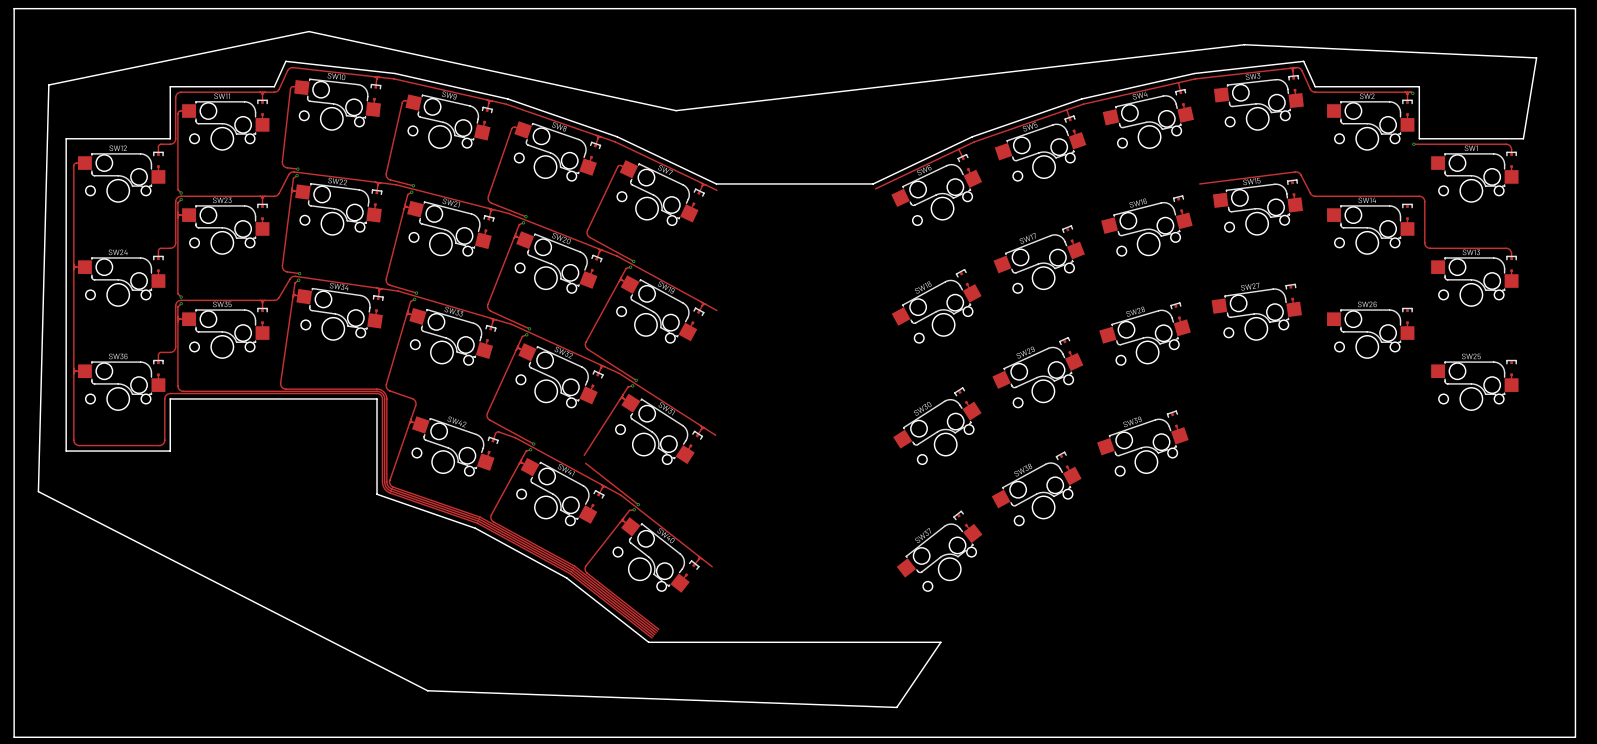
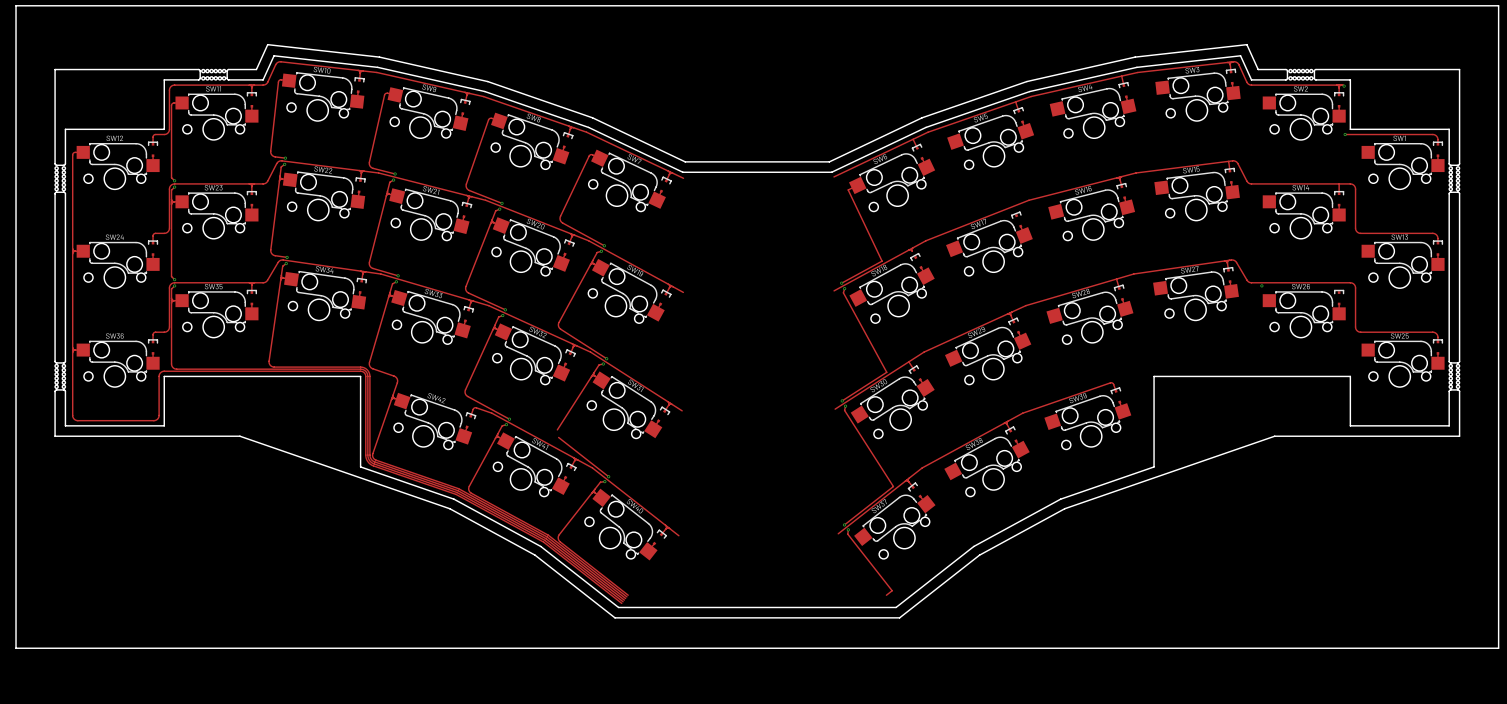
round board edge: none -> [201, 69, 206, 73]
round board edge: none -> [205, 69, 210, 73]
round board edge: none -> [209, 69, 214, 73]
round board edge: none -> [213, 69, 218, 73]
round board edge: none -> [218, 69, 222, 73]
round board edge: none -> [222, 69, 226, 73]
round board edge: none -> [1288, 69, 1293, 73]
round board edge: none -> [1292, 69, 1297, 73]
round board edge: none -> [1297, 69, 1301, 73]
round board edge: none -> [1301, 69, 1305, 73]
round board edge: none -> [1305, 69, 1309, 73]
round board edge: none -> [1309, 69, 1314, 73]
round board edge: none -> [201, 76, 206, 81]
round board edge: none -> [205, 76, 210, 81]
round board edge: none -> [209, 76, 214, 81]
round board edge: none -> [213, 76, 218, 81]
round board edge: none -> [218, 76, 222, 81]
round board edge: none -> [222, 76, 226, 81]
round board edge: none -> [1288, 76, 1293, 81]
round board edge: none -> [1292, 76, 1297, 81]
round board edge: none -> [1297, 76, 1301, 81]
round board edge: none -> [1301, 76, 1305, 81]
round board edge: none -> [1305, 76, 1309, 81]
round board edge: none -> [1309, 76, 1314, 81]
board edge: (206, 86) (238, 86) -> (1285, 79) (1286, 69) (1258, 69) (1246, 44) (1135, 57) (1026, 81) (922, 117) (829, 161) (685, 161) (592, 117) (487, 81) (379, 57) (267, 44) (256, 69) (228, 69) (228, 79)
board edge: (1351, 86) (1383, 86) -> (1449, 129) (1449, 164) (1458, 165) (1459, 69) (1315, 69) (1314, 78) (1315, 79)
board edge: (1523, 138) (1536, 57) (1244, 44) (676, 110) (309, 31) (48, 84) (38, 491) (427, 690) (896, 707) (940, 642) -> (65, 391) (55, 391) (55, 436) (239, 436) (449, 508) (535, 555) (614, 617) (899, 617) (979, 555) (1064, 508) (1274, 436) (1459, 436) (1459, 390) (1449, 391) (1449, 425) (1350, 425) (1350, 376) (1154, 376) (1154, 466) (1060, 499) (973, 546) (896, 607)
track: none -> (1228, 161) (1229, 171)
board edge: (66, 174) (66, 206) -> (65, 163) (63, 165) (55, 163) (55, 69) (198, 69) (200, 78) (198, 79)
round board edge: none -> [54, 166, 59, 171]
round board edge: none -> [62, 166, 66, 171]
round board edge: none -> [1448, 166, 1453, 171]
round board edge: none -> [1456, 166, 1460, 171]
round board edge: none -> [54, 170, 59, 175]
round board edge: none -> [62, 170, 66, 175]
round board edge: none -> [1448, 170, 1453, 175]
round board edge: none -> [1456, 170, 1460, 175]
track: none -> (1141, 172) (1028, 200) (925, 240) (834, 290)
round board edge: none -> [54, 174, 59, 179]
round board edge: none -> [62, 174, 66, 179]
round board edge: none -> [1448, 174, 1453, 179]
round board edge: none -> [1456, 174, 1460, 179]
track: none -> (1121, 176) (1120, 179) (1116, 177)
track: none -> (1119, 177) (1121, 186)
round board edge: none -> [54, 179, 59, 183]
round board edge: none -> [62, 179, 66, 183]
round board edge: none -> [1448, 179, 1453, 183]
round board edge: none -> [1456, 179, 1460, 183]
round board edge: none -> [54, 183, 59, 187]
round board edge: none -> [62, 183, 66, 187]
round board edge: none -> [1448, 183, 1453, 187]
round board edge: none -> [1456, 183, 1460, 187]
track: none -> (1339, 183) (1339, 193)
track: none -> (857, 185) (848, 189) (882, 261) (841, 283)
round board edge: none -> [54, 187, 59, 191]
round board edge: none -> [62, 187, 66, 191]
round board edge: none -> [1448, 187, 1453, 191]
round board edge: none -> [1456, 187, 1460, 191]
board edge: none -> (1450, 192) (1459, 193) (1459, 361) (1458, 362) (1449, 361) (1449, 193) (1450, 192)
track: none -> (913, 247) (912, 251) (908, 250)
track: none -> (1229, 260) (1227, 263) (1224, 260)
track: none -> (1227, 260) (1228, 270)
track: none -> (1116, 279) (1119, 288)
via: none -> (841, 283)
via: none -> (1261, 285)
track: none -> (844, 288) (843, 292) (886, 372) (842, 400)
via: none -> (844, 288)
track: none -> (1012, 311) (1010, 315) (1007, 314)
track: none -> (1009, 313) (1013, 321)
track: none -> (1437, 341) (1437, 335) (1433, 332) (1357, 331) (1355, 327) (1355, 287) (1352, 283) (1250, 282) (1247, 280) (1236, 261) (1231, 260) (1133, 274) (1026, 305) (923, 352) (835, 409)
board edge: (66, 383) (66, 414) -> (65, 361) (63, 362) (55, 361) (55, 193) (56, 192) (65, 193)
track: none -> (908, 361) (914, 370)
round board edge: none -> [54, 364, 59, 368]
round board edge: none -> [62, 364, 66, 368]
round board edge: none -> [1448, 364, 1453, 368]
round board edge: none -> [1456, 364, 1460, 368]
round board edge: none -> [54, 368, 59, 373]
round board edge: none -> [62, 368, 66, 373]
round board edge: none -> [1448, 368, 1453, 373]
round board edge: none -> [1456, 368, 1460, 373]
round board edge: none -> [54, 372, 59, 377]
round board edge: none -> [62, 372, 66, 377]
round board edge: none -> [1448, 372, 1453, 377]
round board edge: none -> [1456, 372, 1460, 377]
round board edge: none -> [54, 376, 59, 381]
round board edge: none -> [62, 376, 66, 381]
round board edge: none -> [1448, 376, 1453, 381]
round board edge: none -> [1456, 376, 1460, 381]
round board edge: none -> [54, 380, 59, 385]
round board edge: none -> [62, 380, 66, 385]
round board edge: none -> [1448, 380, 1453, 385]
round board edge: none -> [1456, 380, 1460, 385]
round board edge: none -> [54, 384, 59, 389]
round board edge: none -> [62, 384, 66, 389]
round board edge: none -> [1448, 384, 1453, 389]
round board edge: none -> [1456, 384, 1460, 389]
track: none -> (1116, 391) (1113, 384) (1110, 382) (1022, 413) (922, 467) (838, 533)
via: none -> (842, 400)
track: none -> (845, 406) (844, 410) (893, 486) (844, 524)
via: none -> (845, 406)
track: none -> (1008, 421) (1007, 424) (1003, 423)
track: none -> (1005, 422) (1010, 430)
track: none -> (909, 478) (908, 481) (905, 481)
track: none -> (907, 479) (913, 487)
via: none -> (844, 524)
track: none -> (848, 529) (847, 534) (892, 590) (886, 595)
via: none -> (848, 529)
board edge: (14, 685) (14, 737) (1575, 737) (1575, 685) -> (16, 648) (1498, 648)

